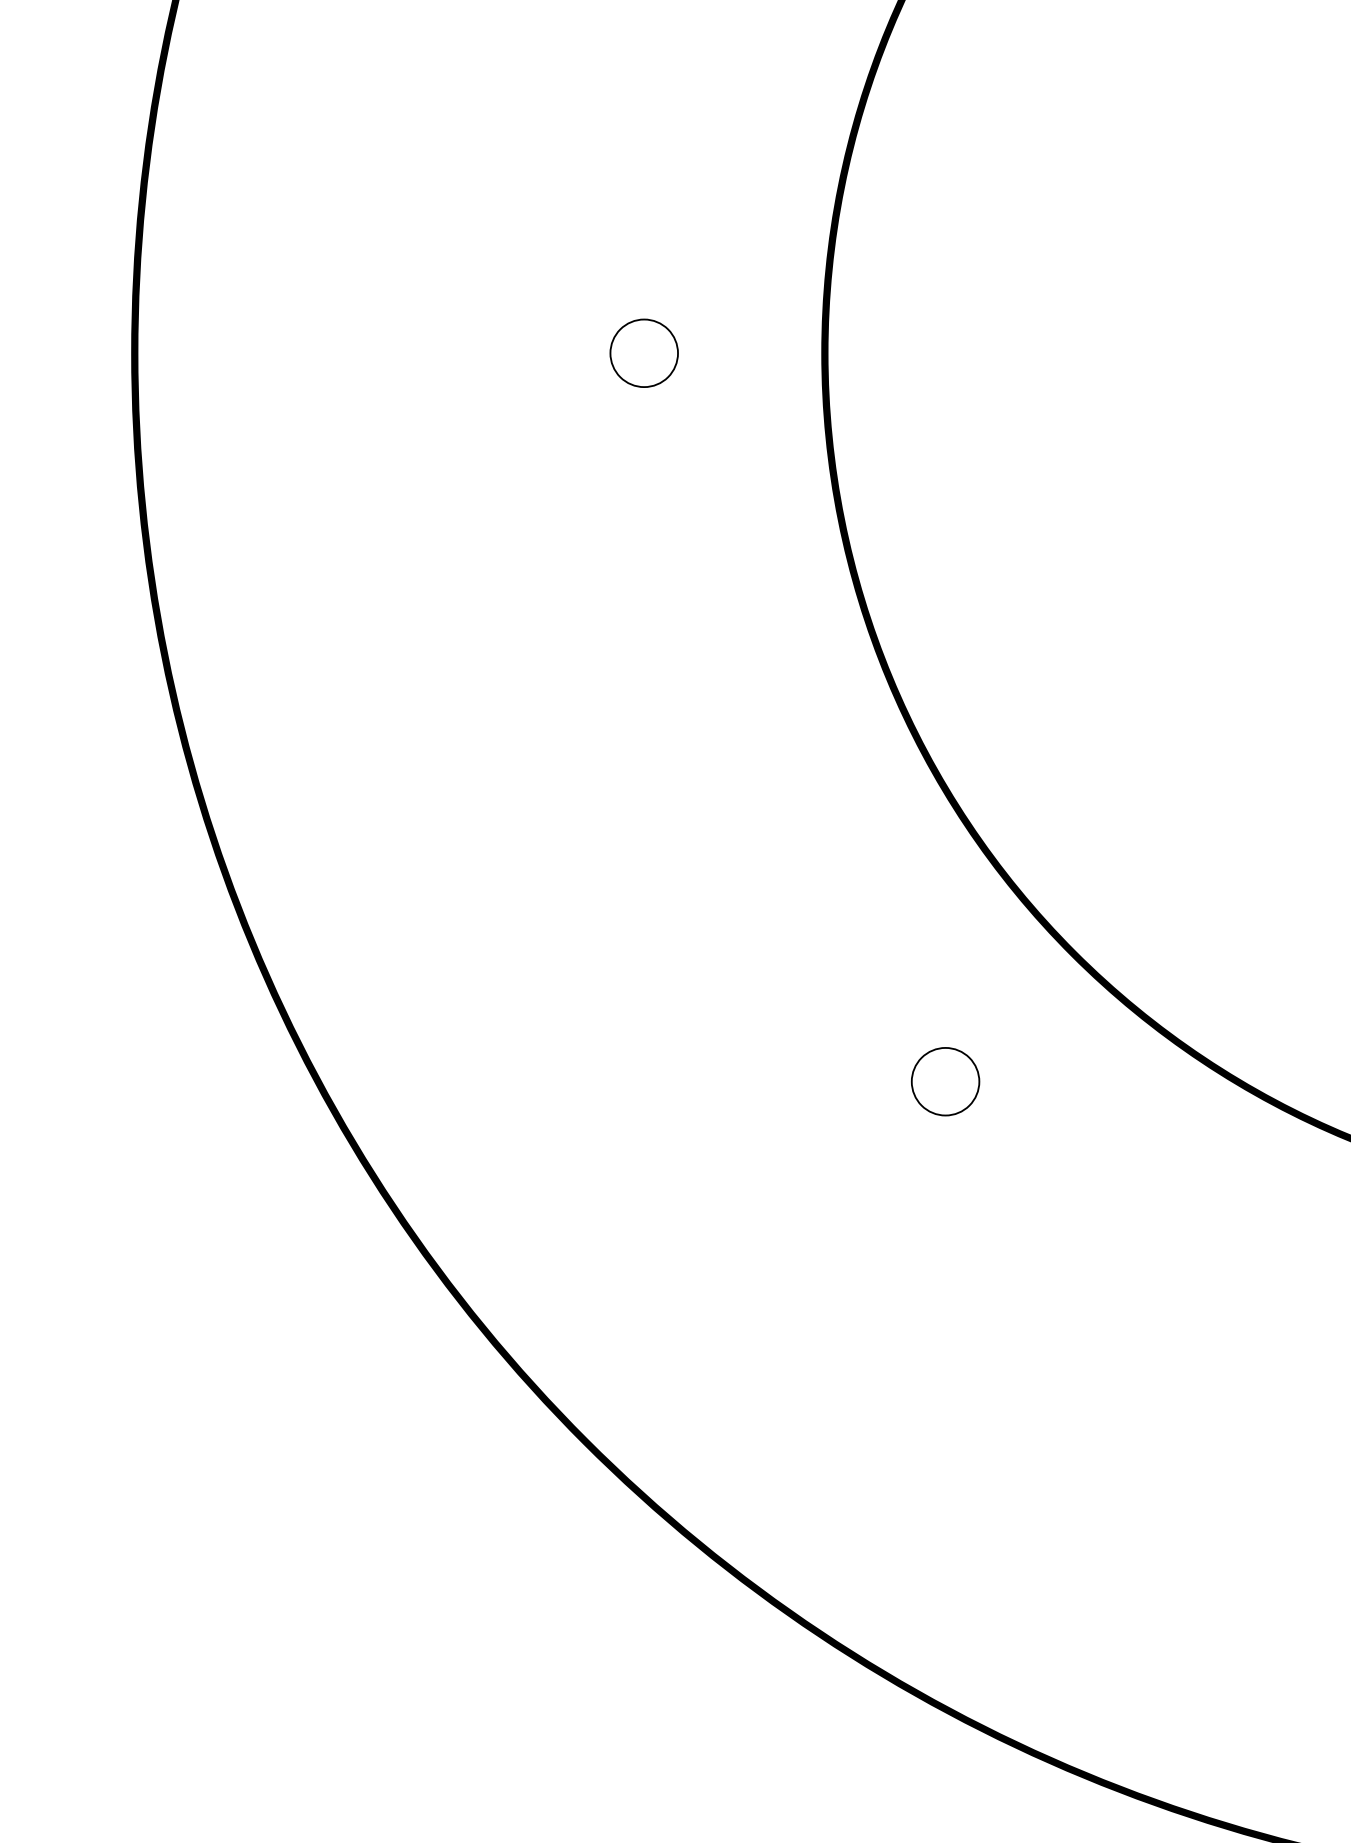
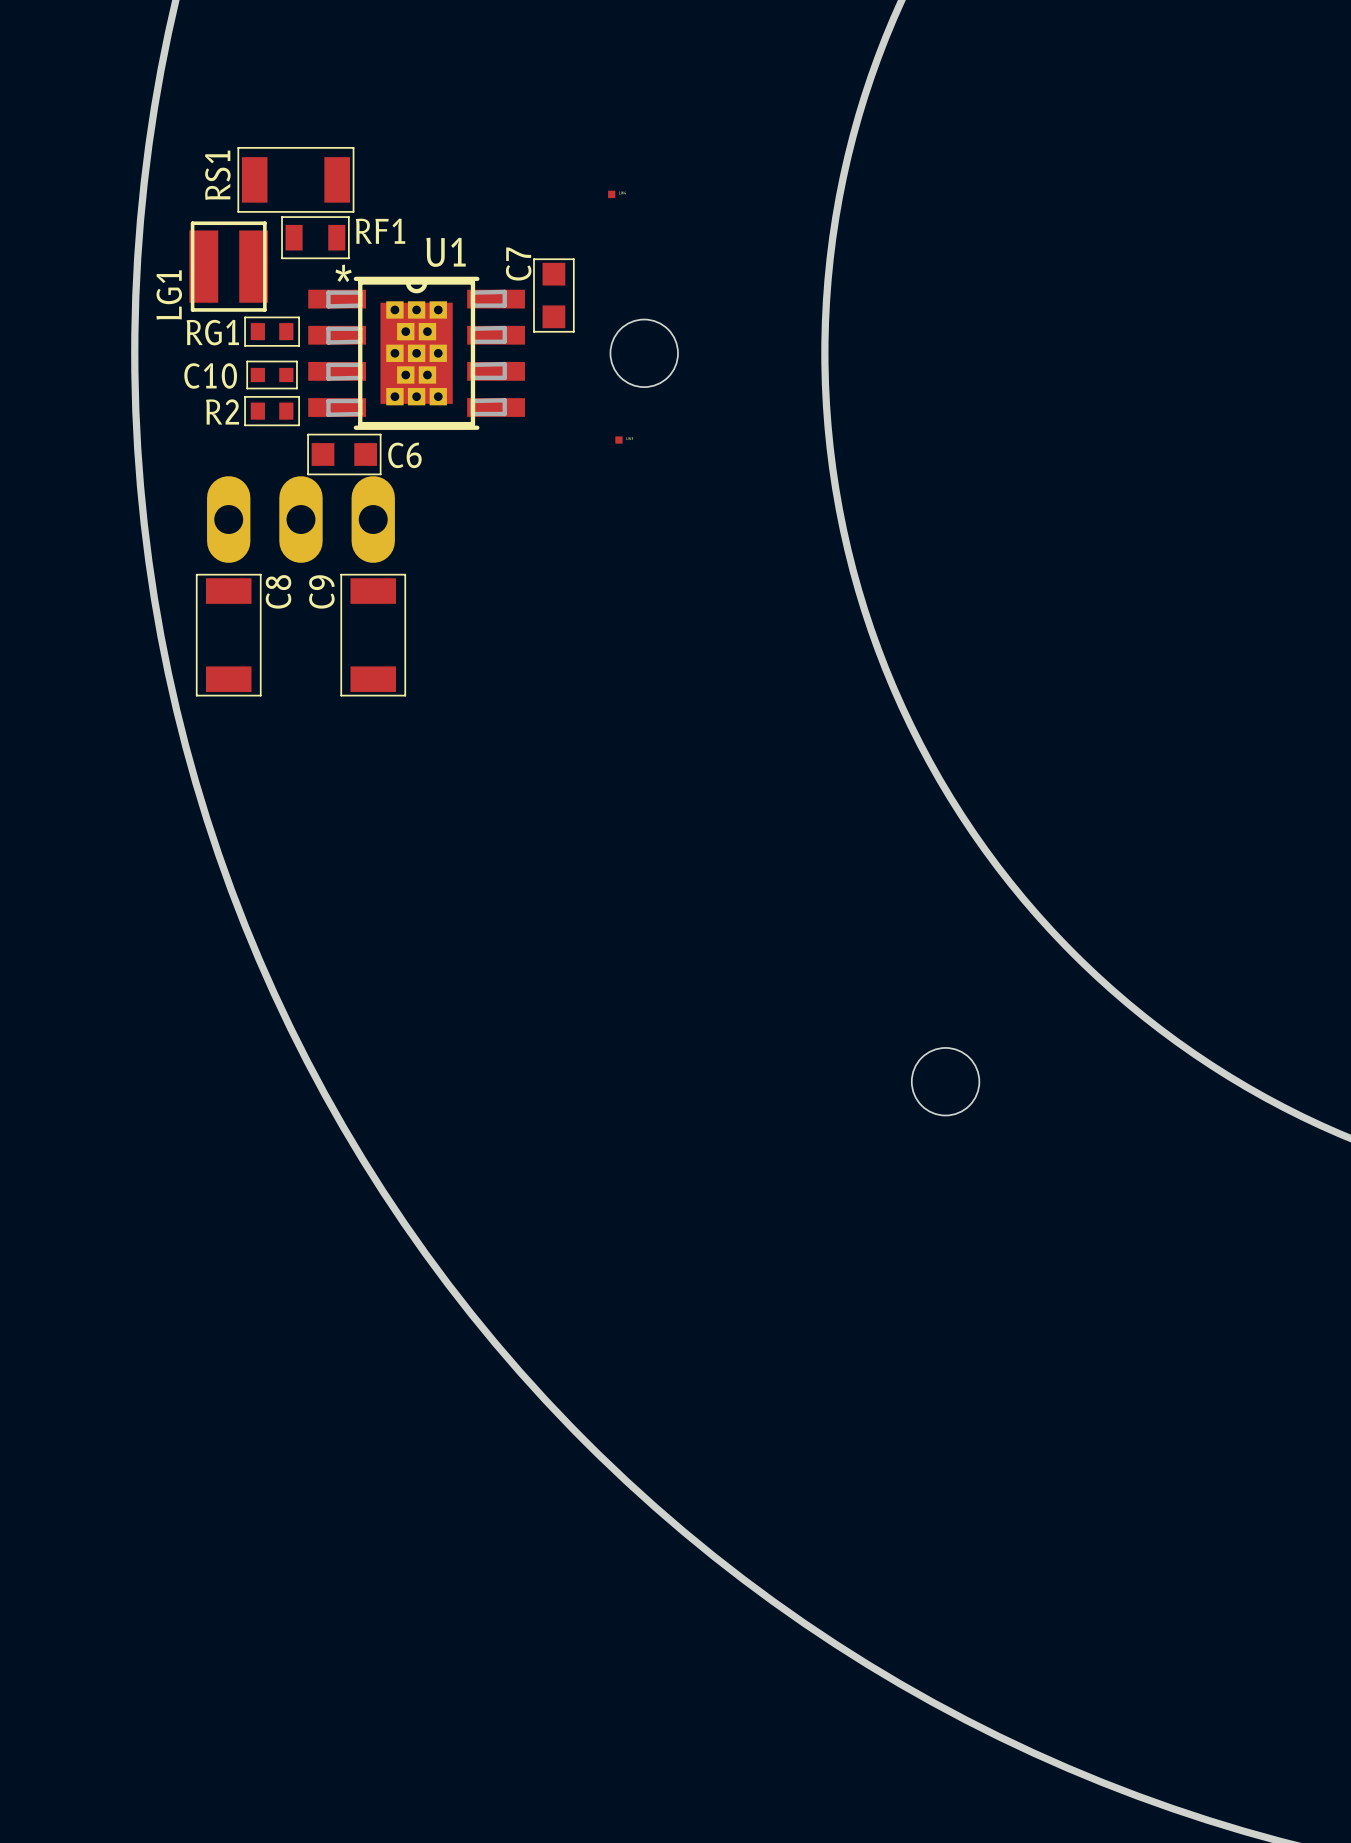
RS1: none -> (295, 179)
part: none -> (611, 194)
RF1: none -> (315, 237)
LG1: none -> (228, 266)
C7: none -> (553, 295)
RG1: none -> (272, 331)
U1: none -> (416, 353)
C10: none -> (272, 374)
R2: none -> (272, 411)
part: none -> (618, 440)
C6: none -> (344, 454)
part: none -> (300, 519)
C8: none -> (228, 635)
C9: none -> (373, 635)

